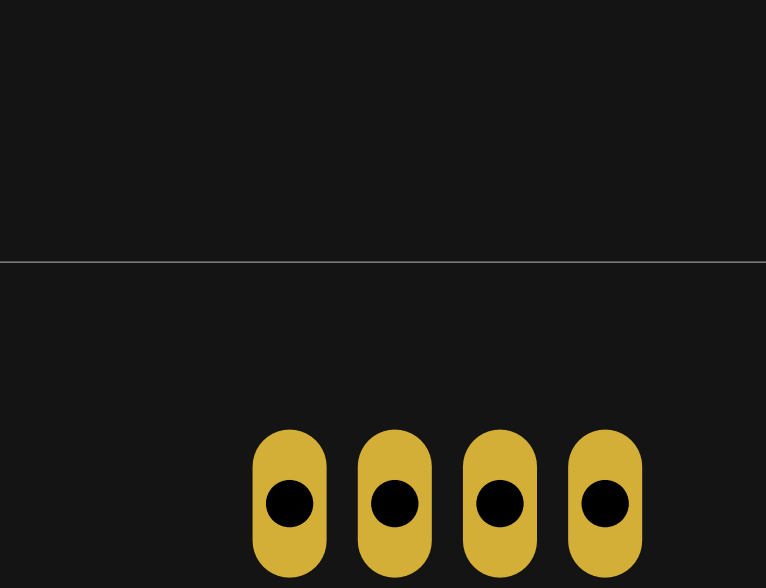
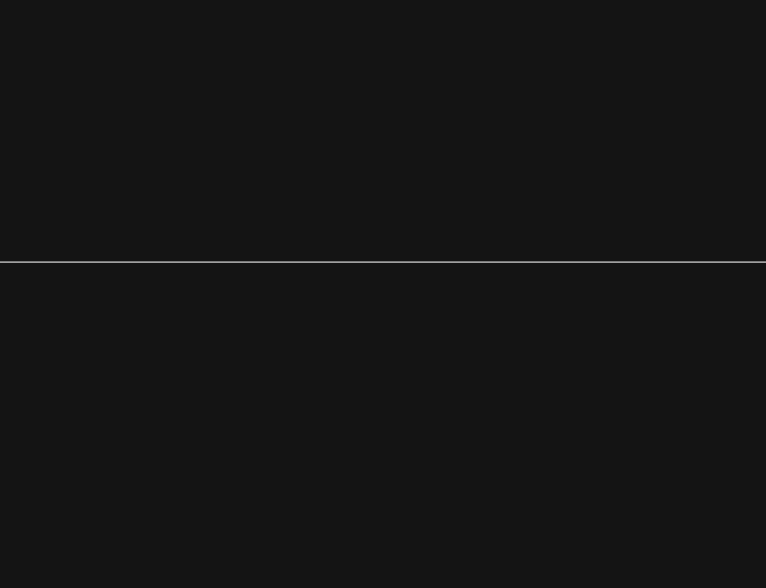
part: (447, 503) -> none

